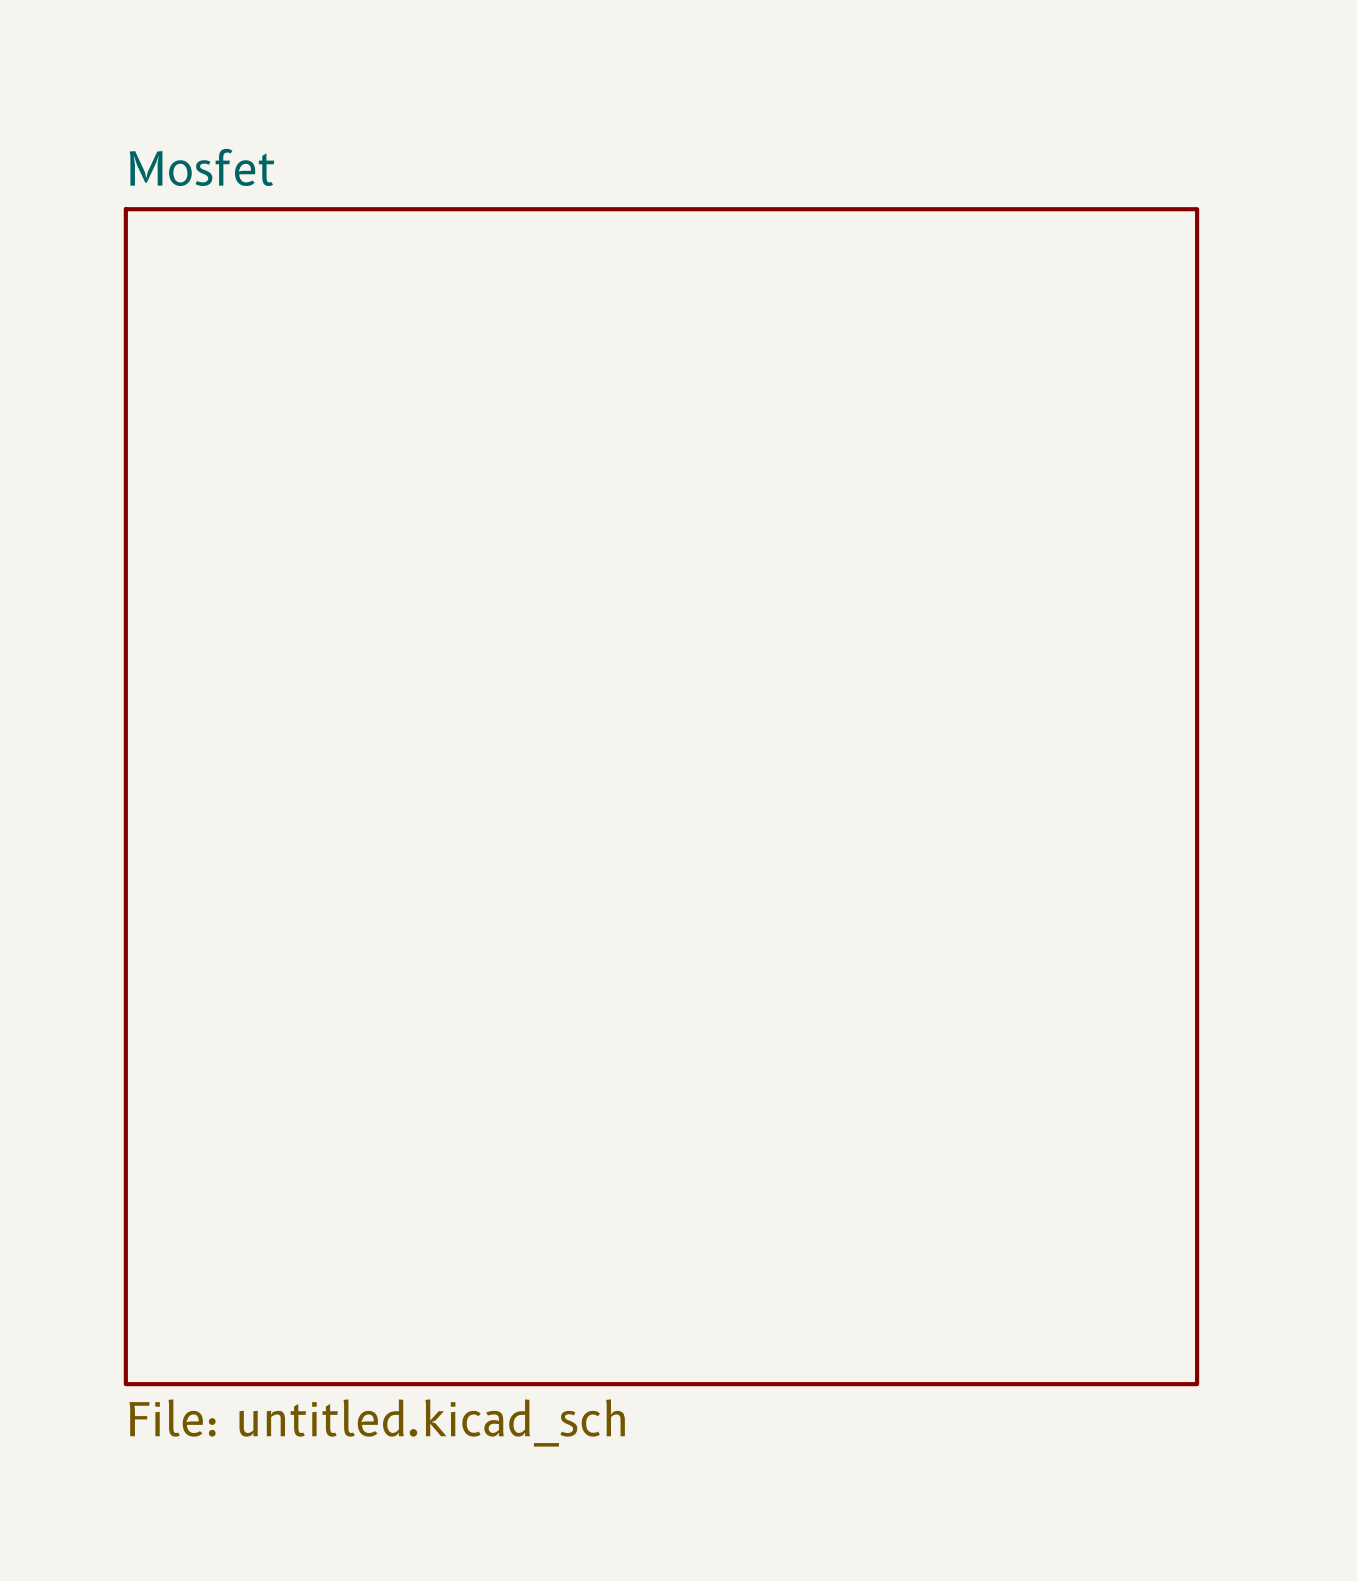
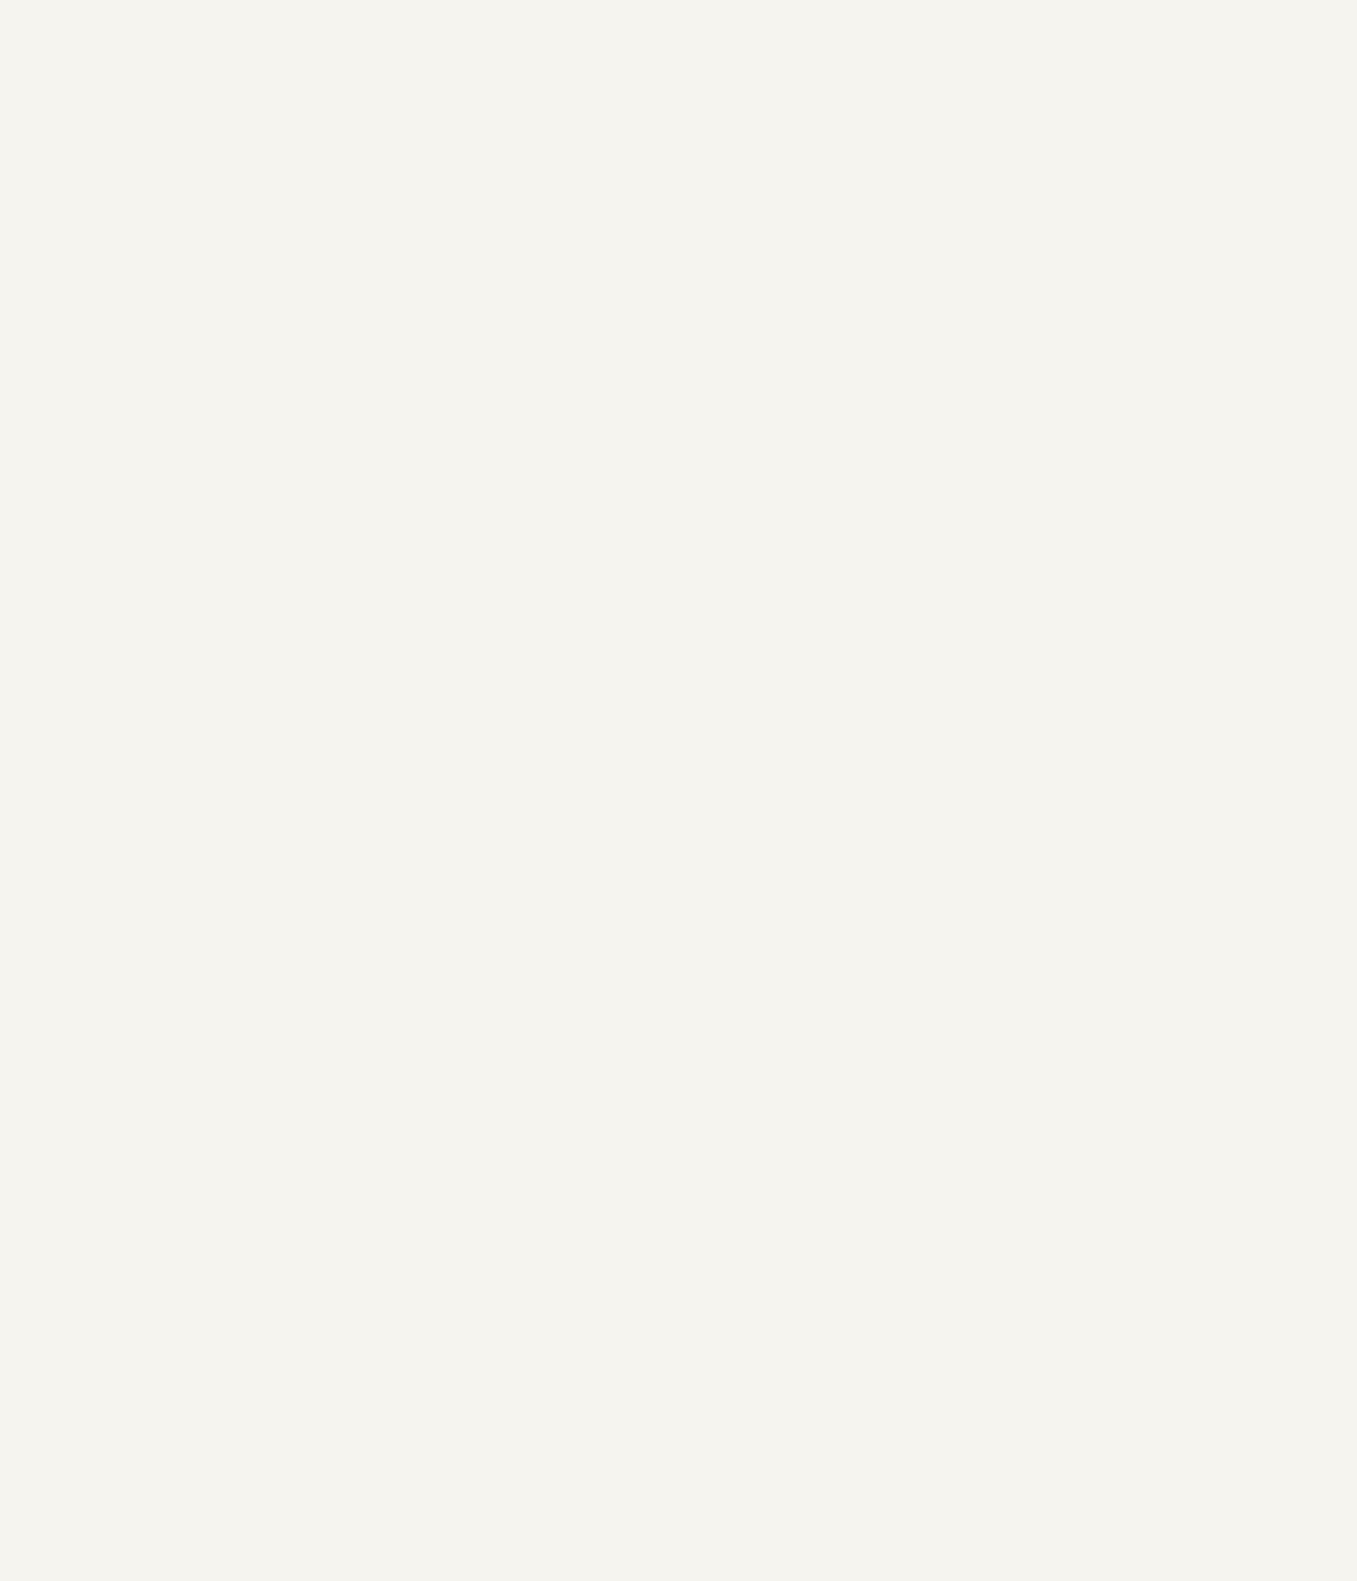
sheet Mosfet: File: untitled.kicad_sch (661, 796) -> none

